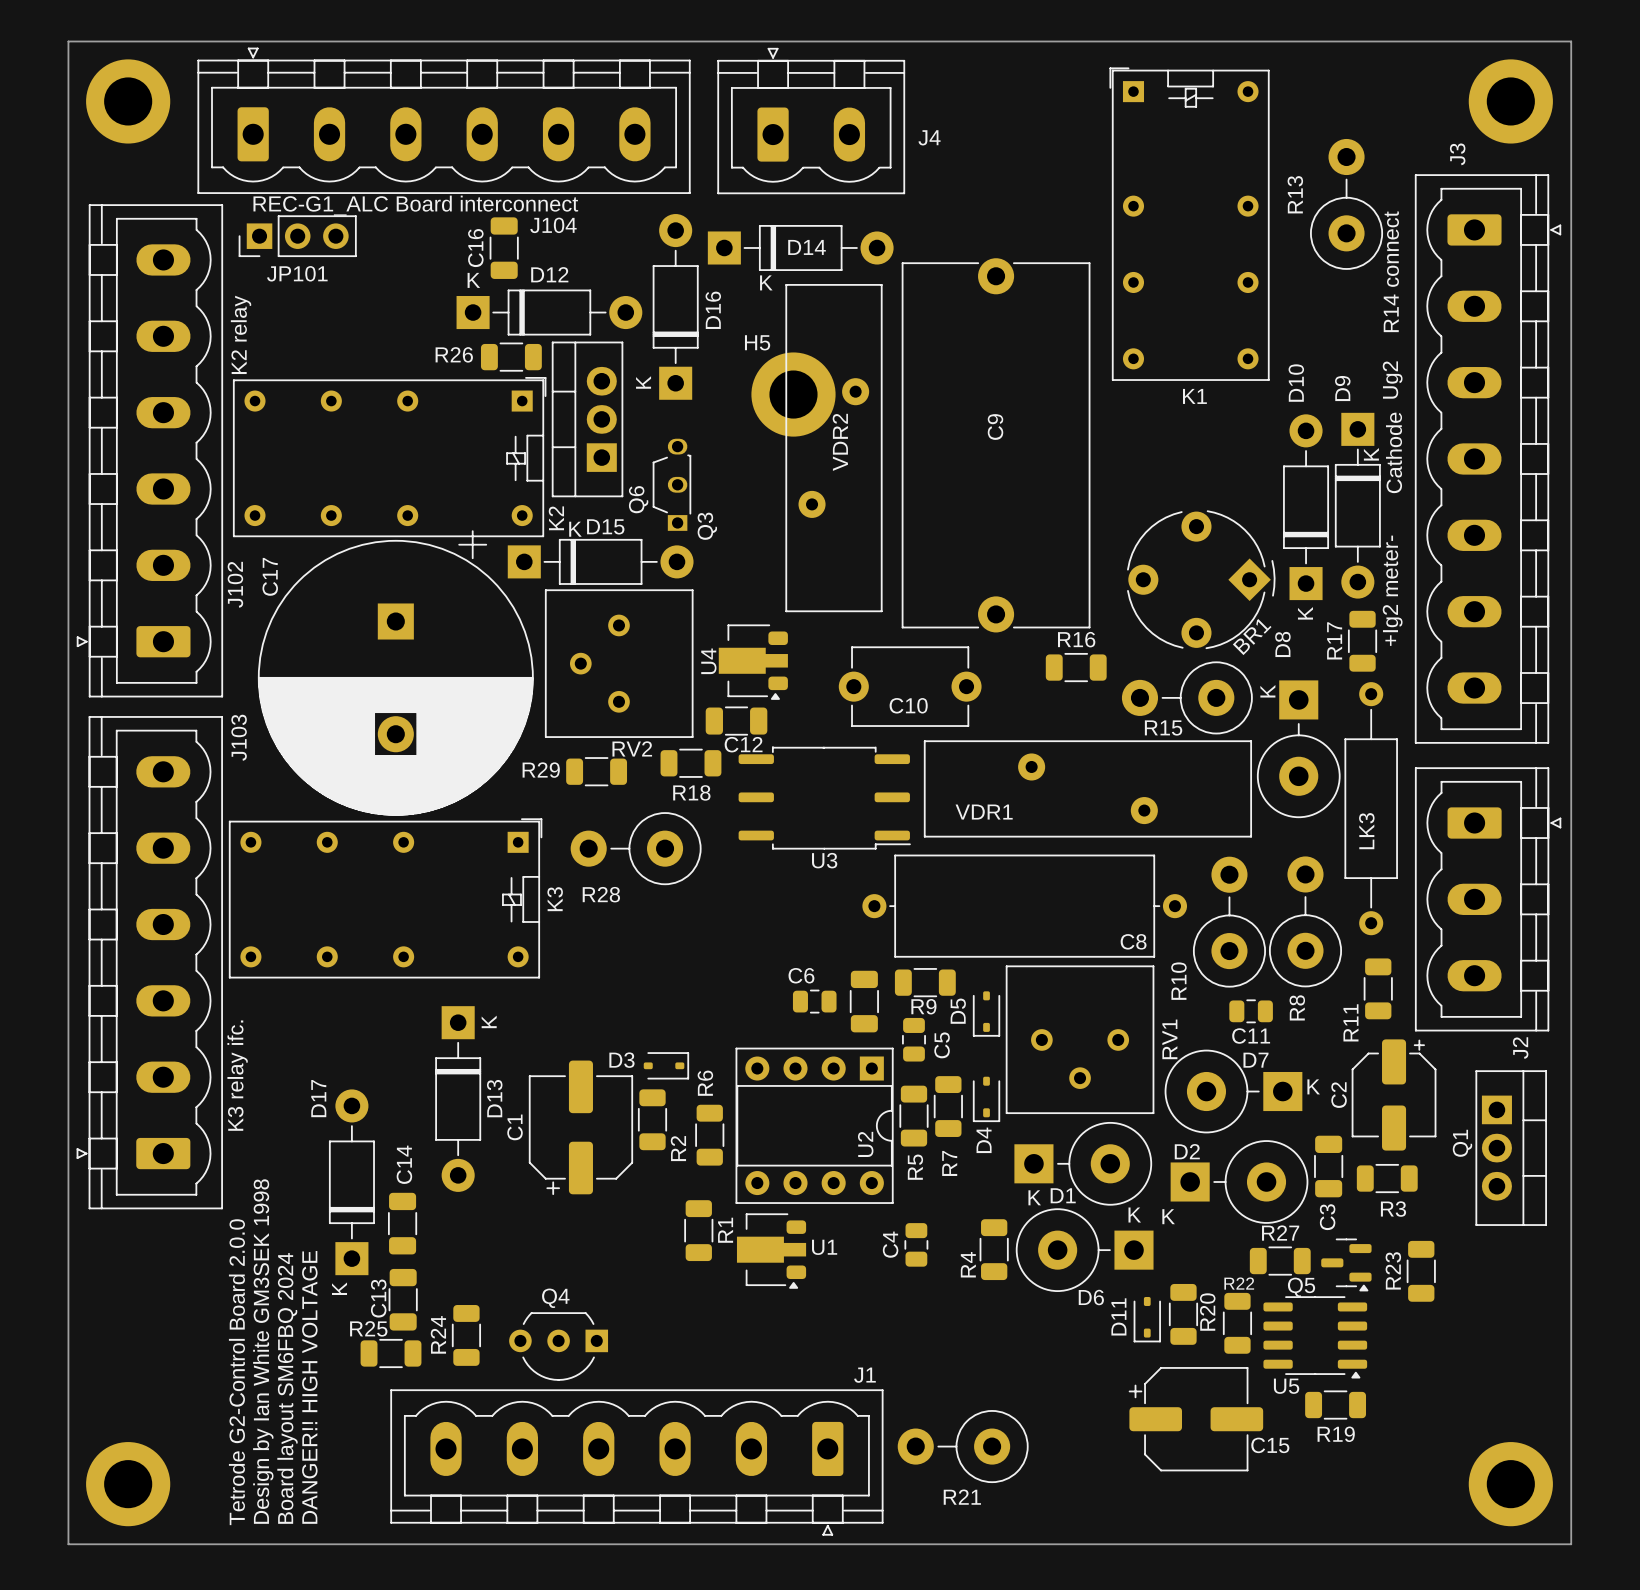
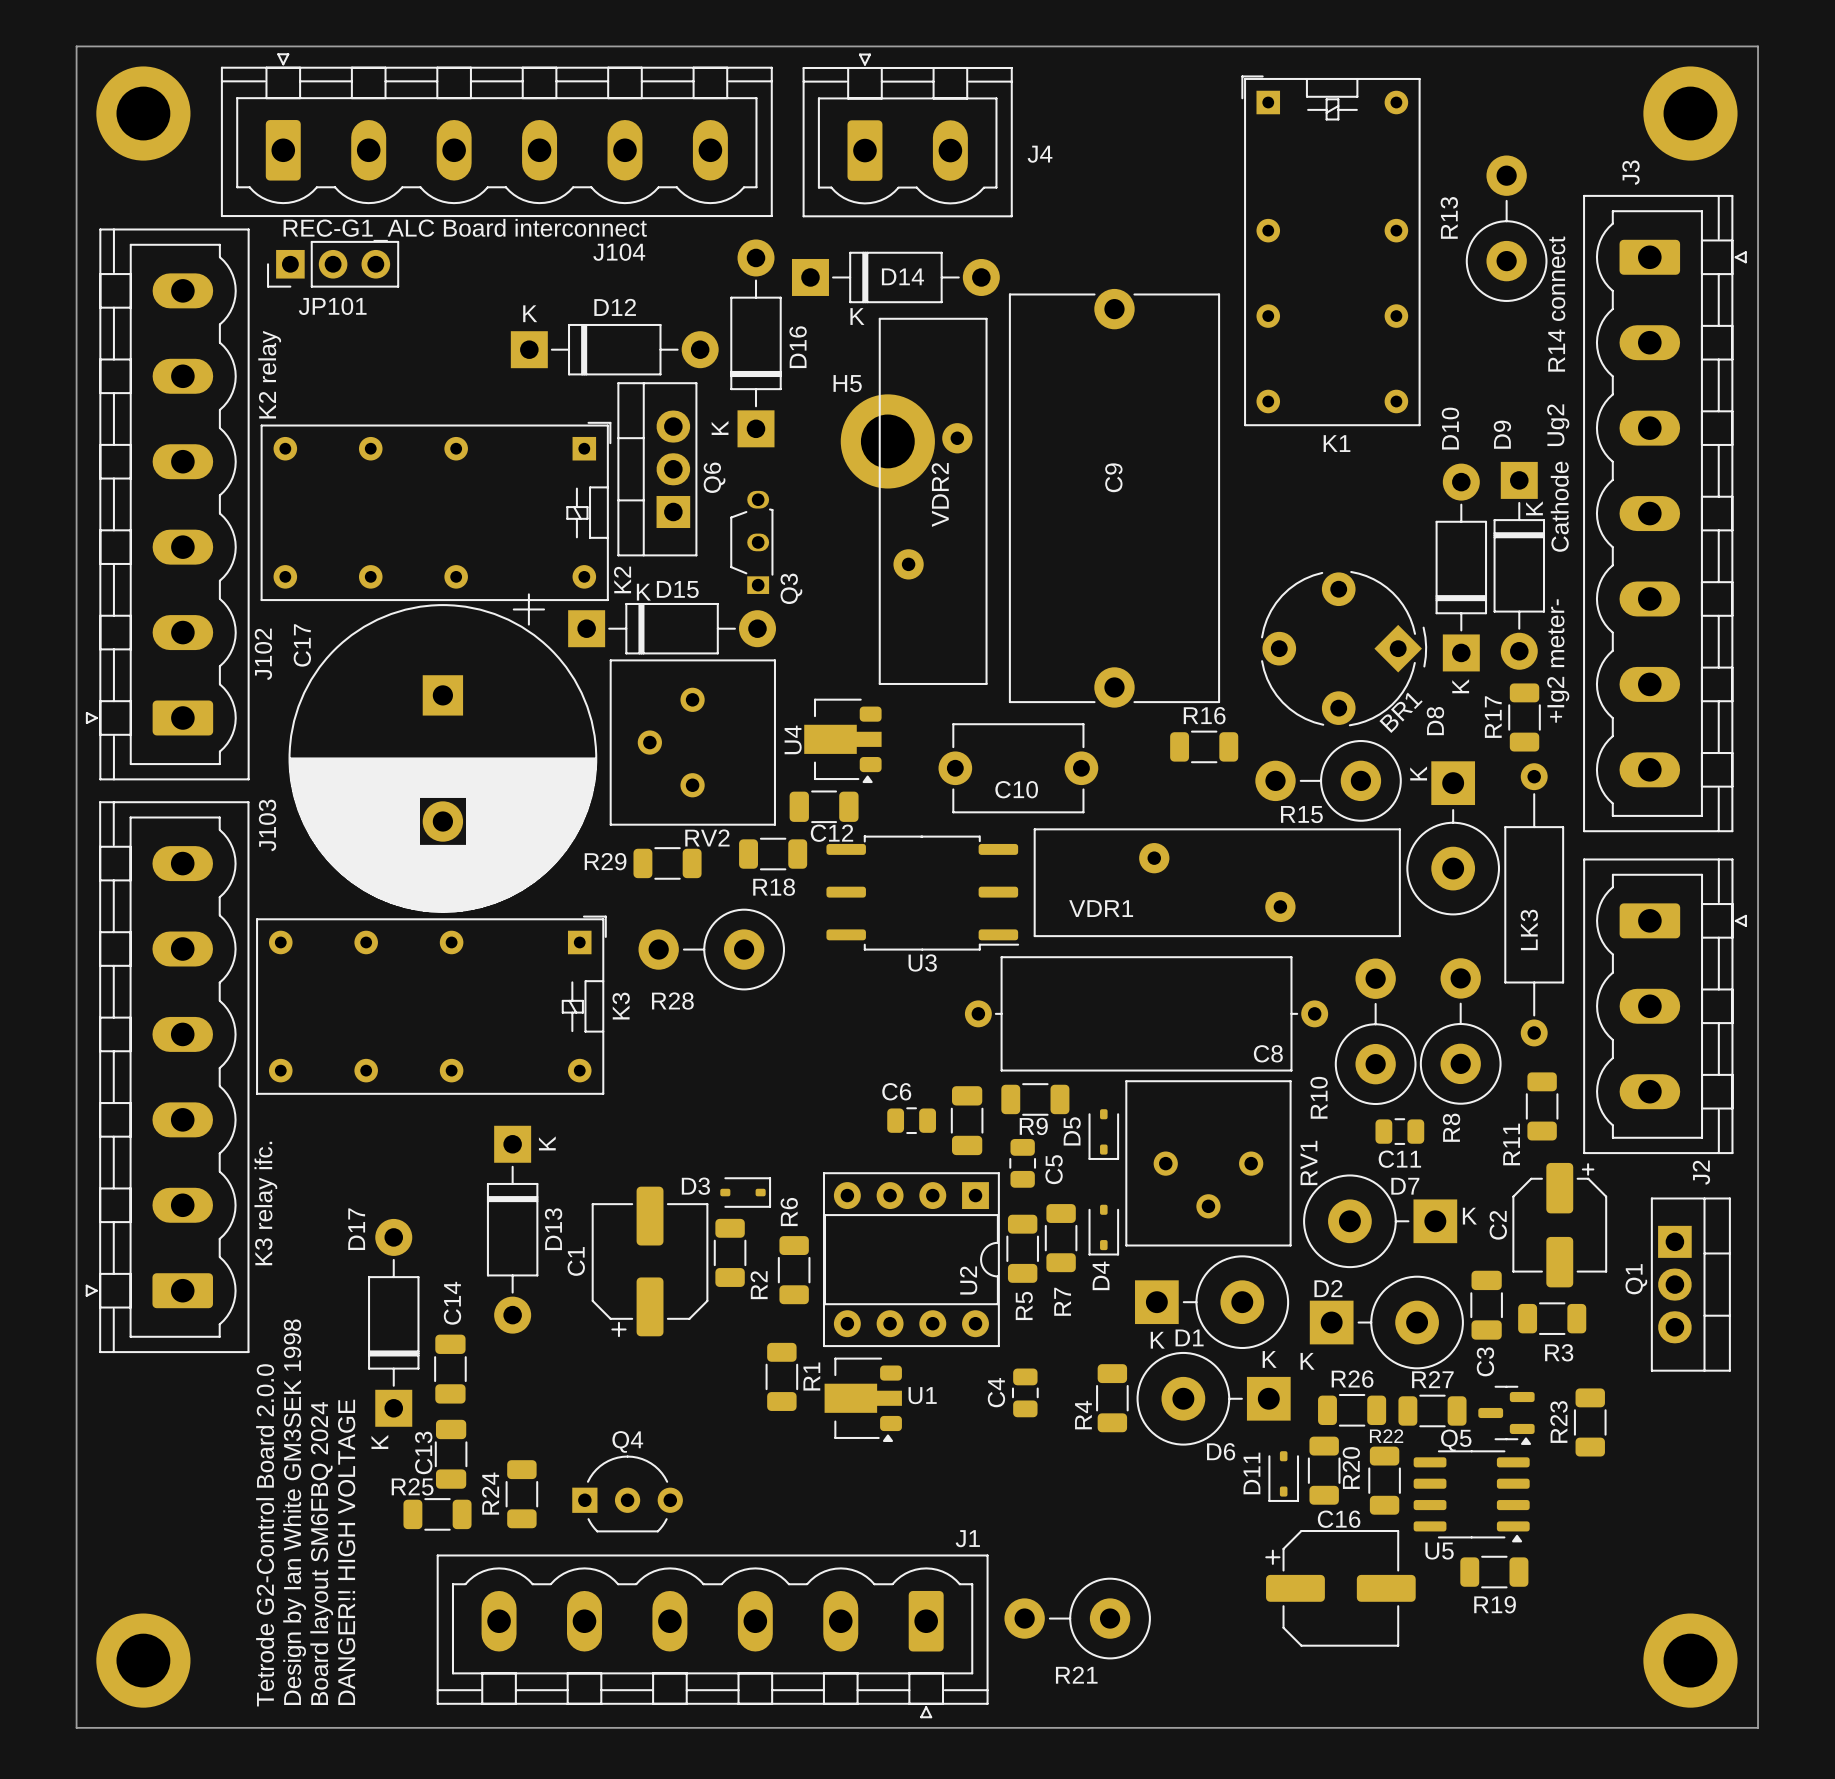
C16 footprint: [489, 217, 519, 279] -> [1265, 1529, 1416, 1647]
C16 name position: C16 (475, 248) -> C16 (1339, 1519)
R26 name position: R26 (454, 354) -> R26 (1352, 1379)
R26 position: (511, 357) -> (1352, 1410)
Q6 name position: Q6 (638, 499) -> Q6 (714, 477)
Q4 rotation: 0° (558, 1346) -> 180° (627, 1493)
C15: (1195, 1419) -> none

